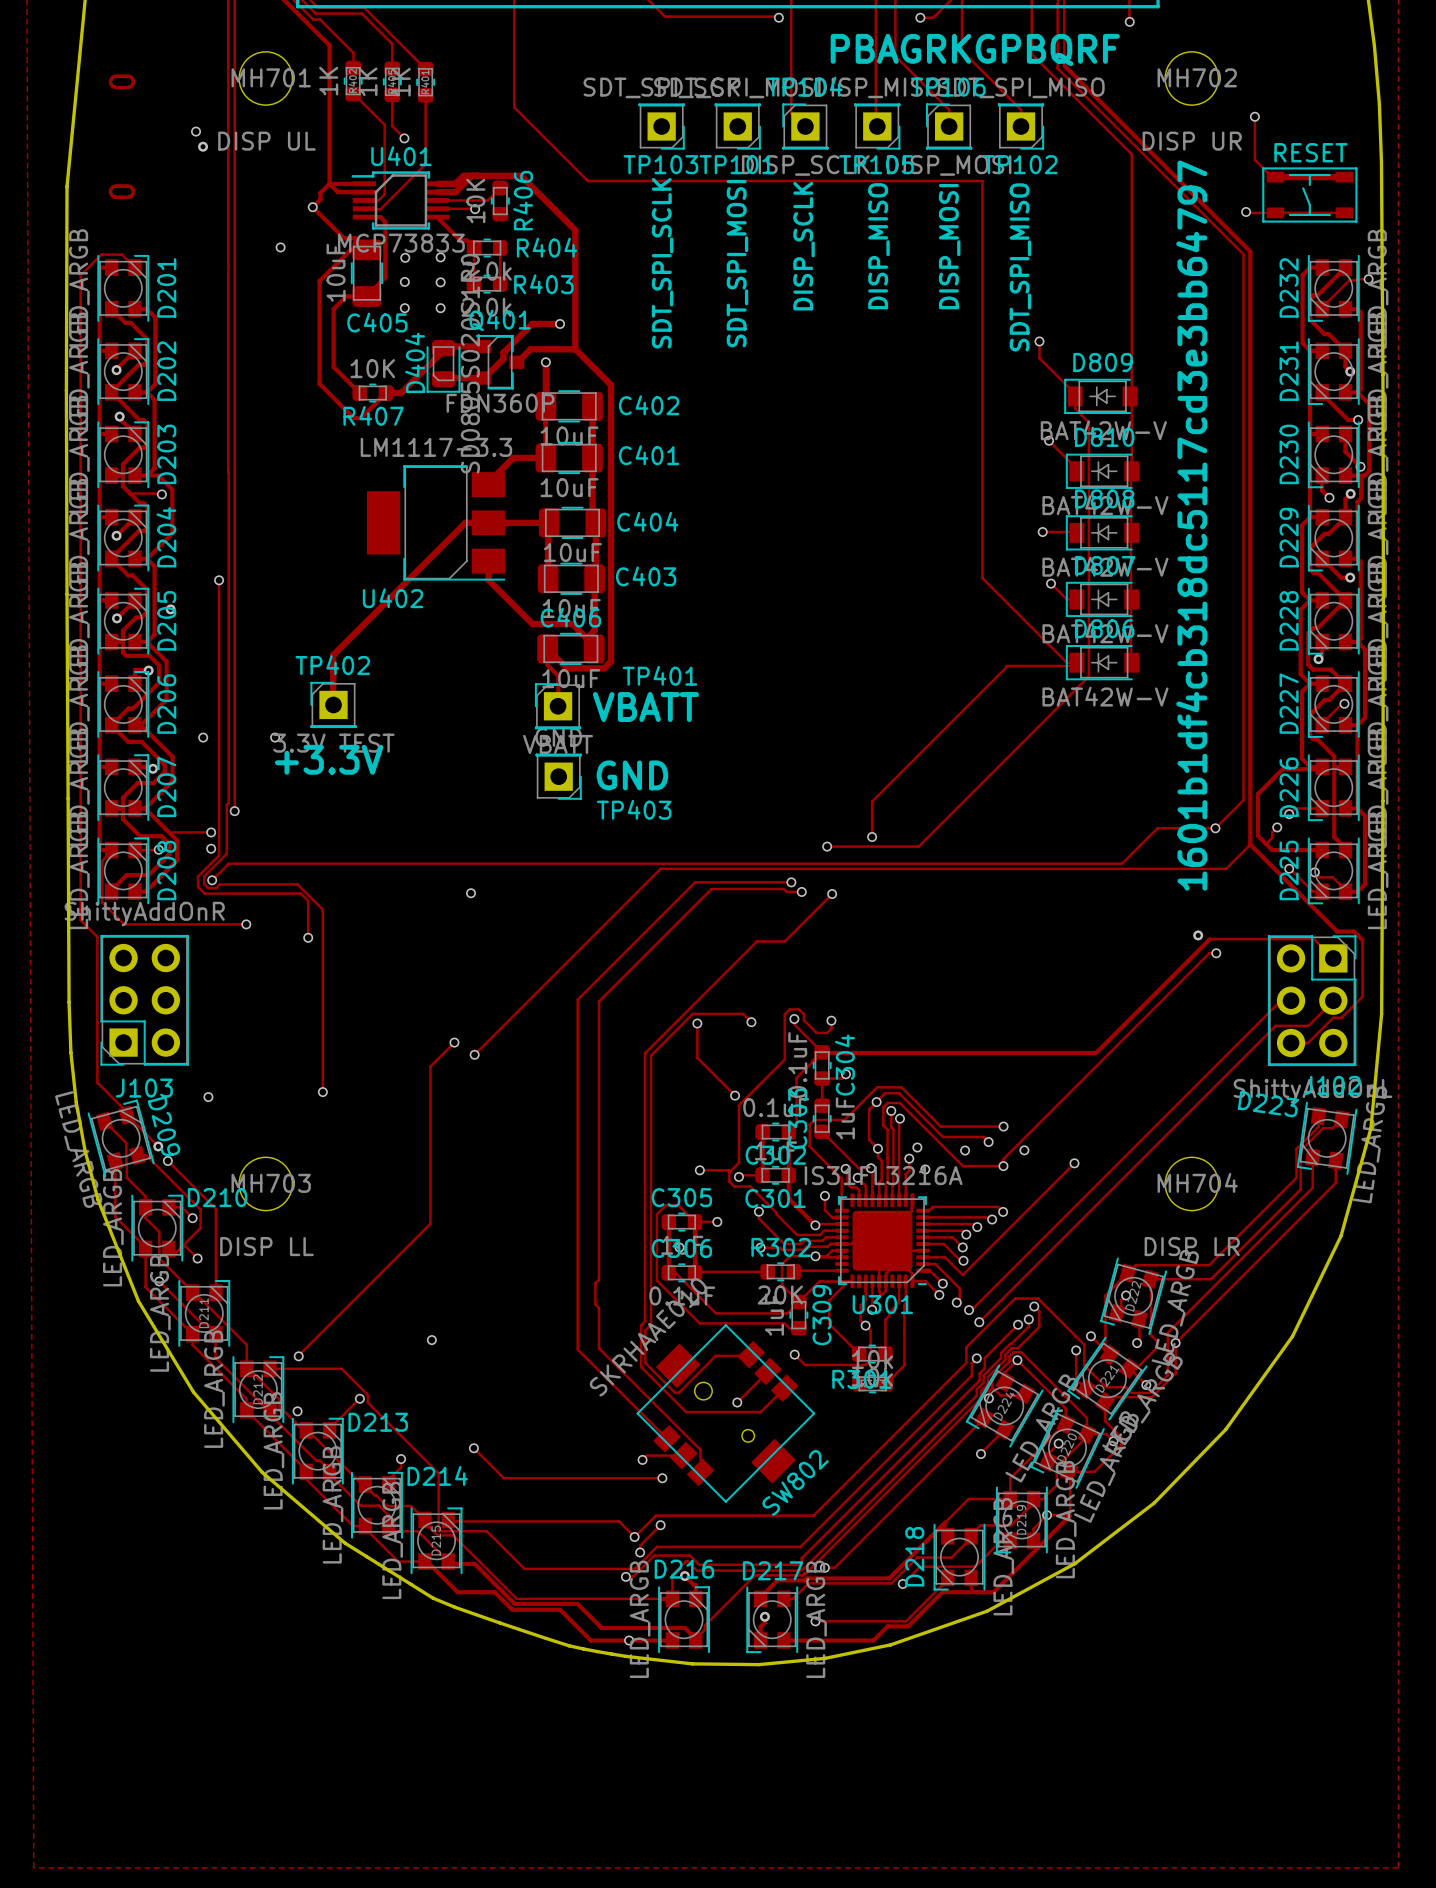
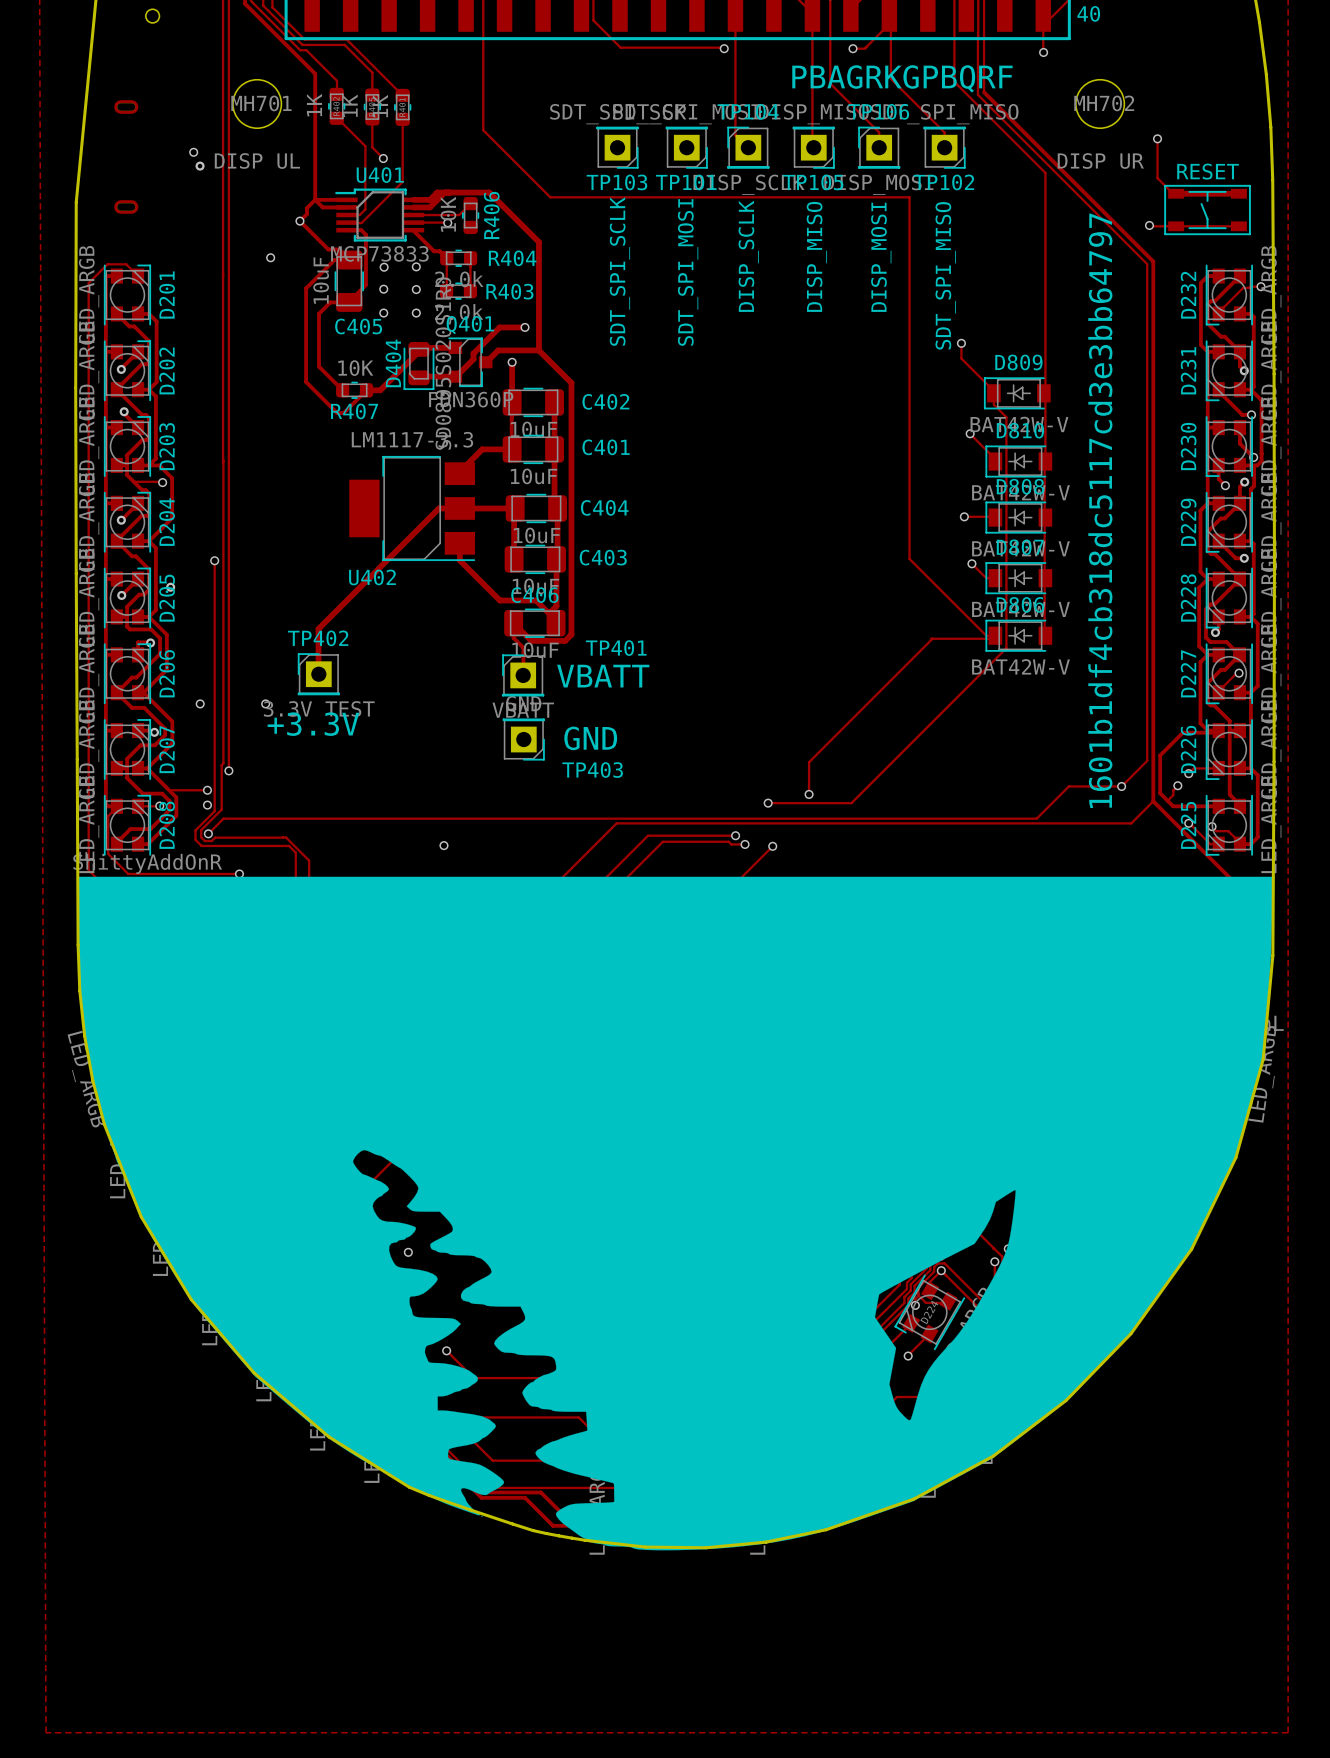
drawing: none -> [77, 876, 1273, 1551]

